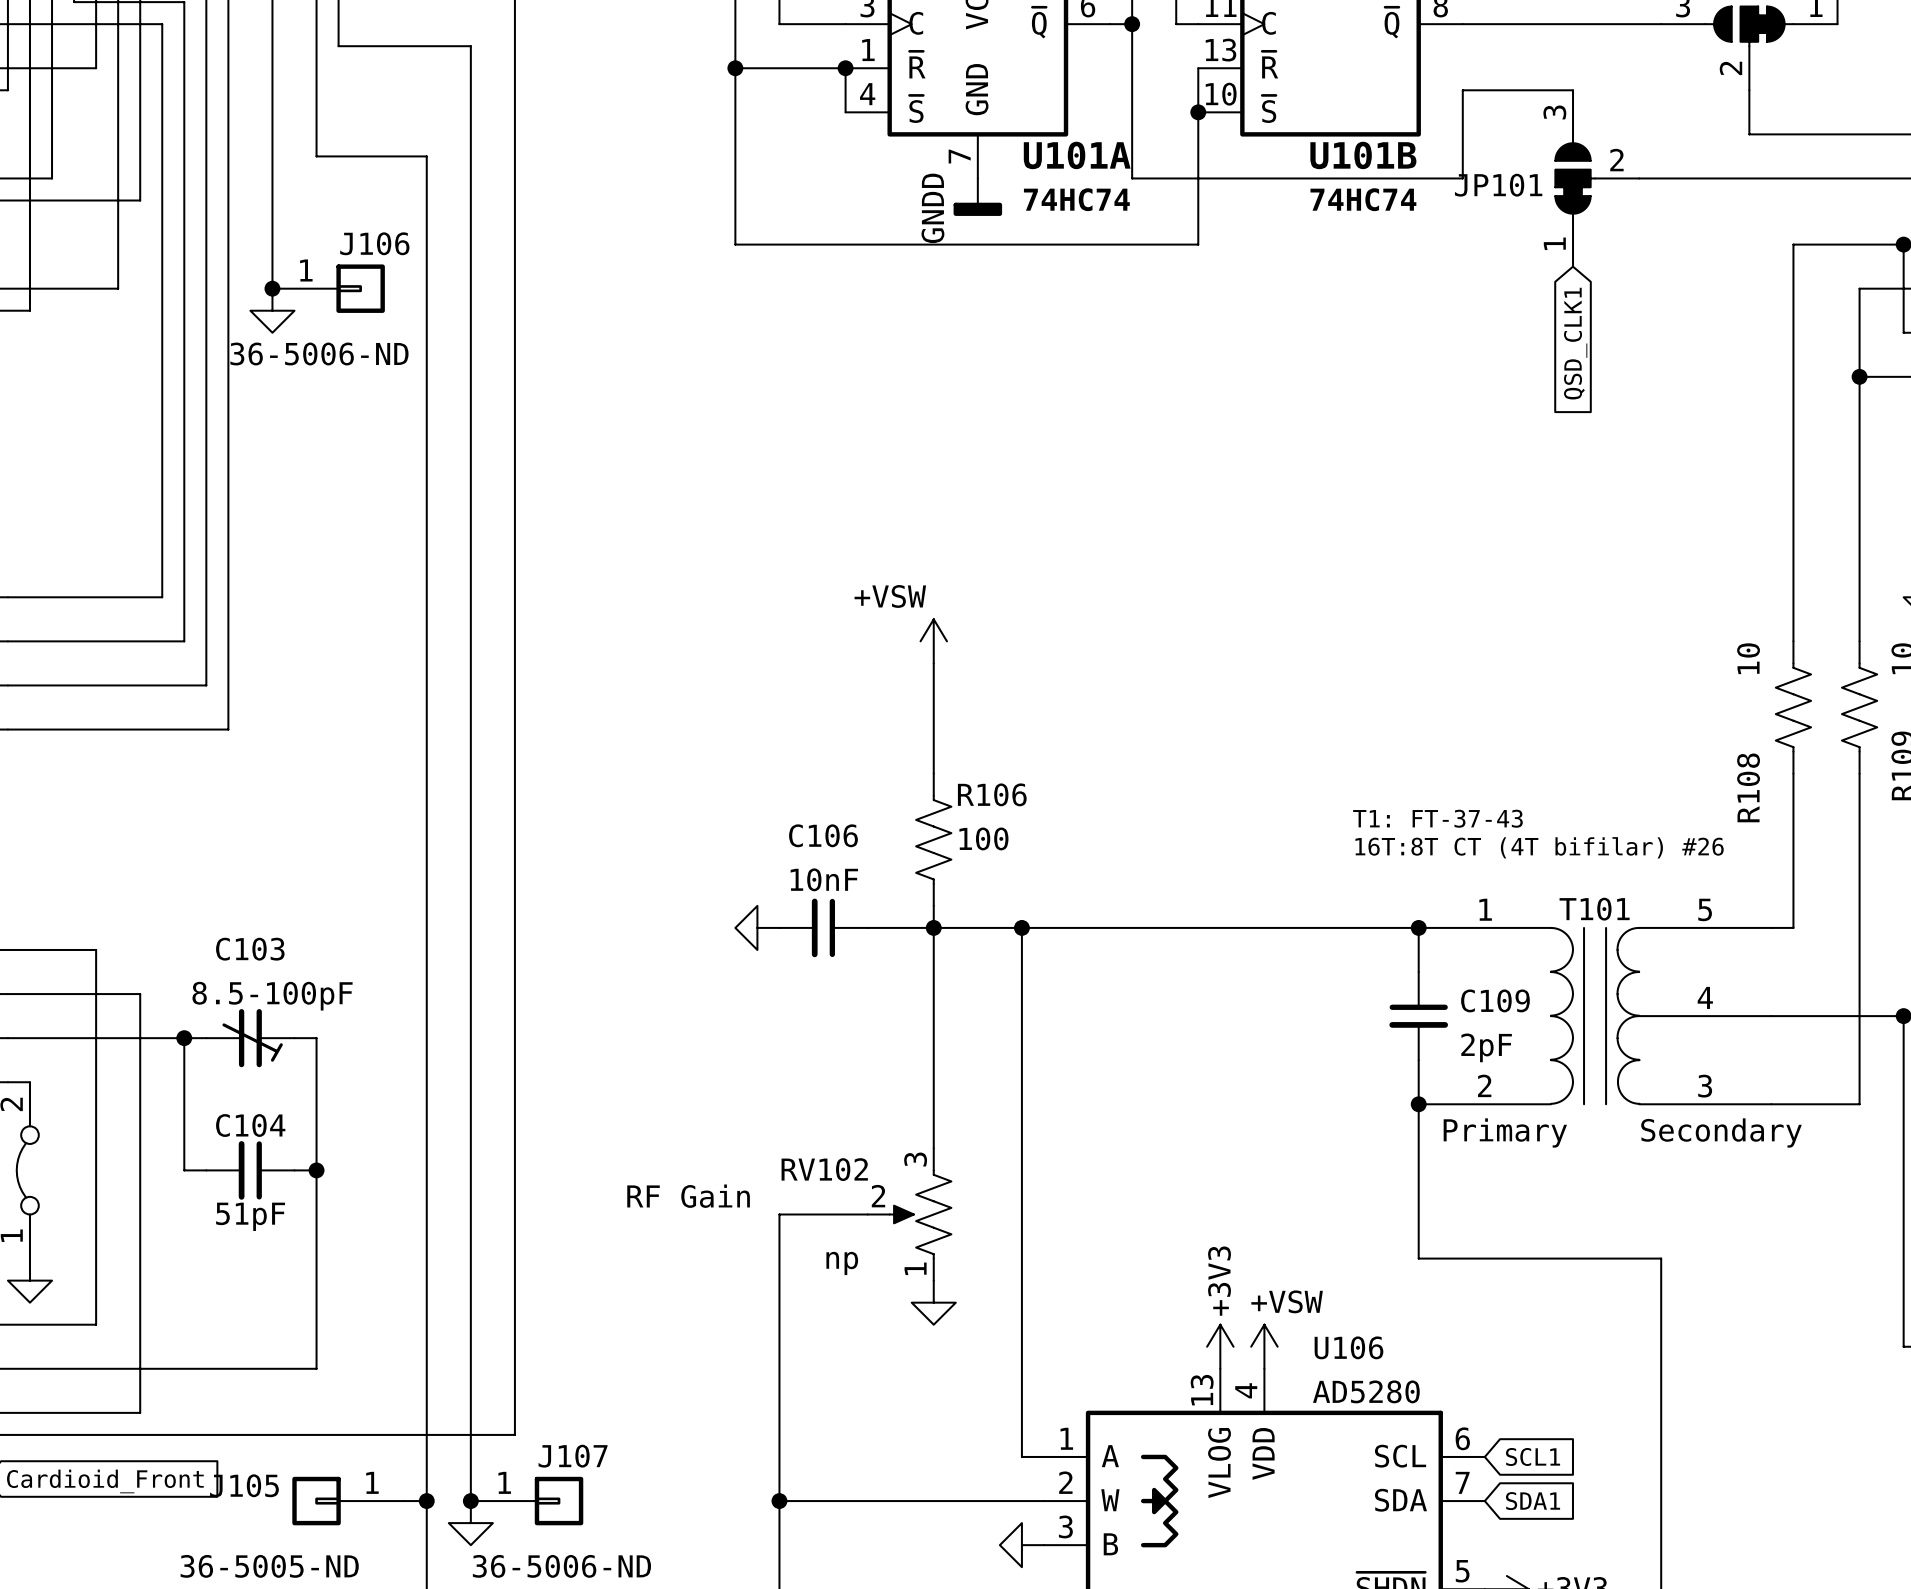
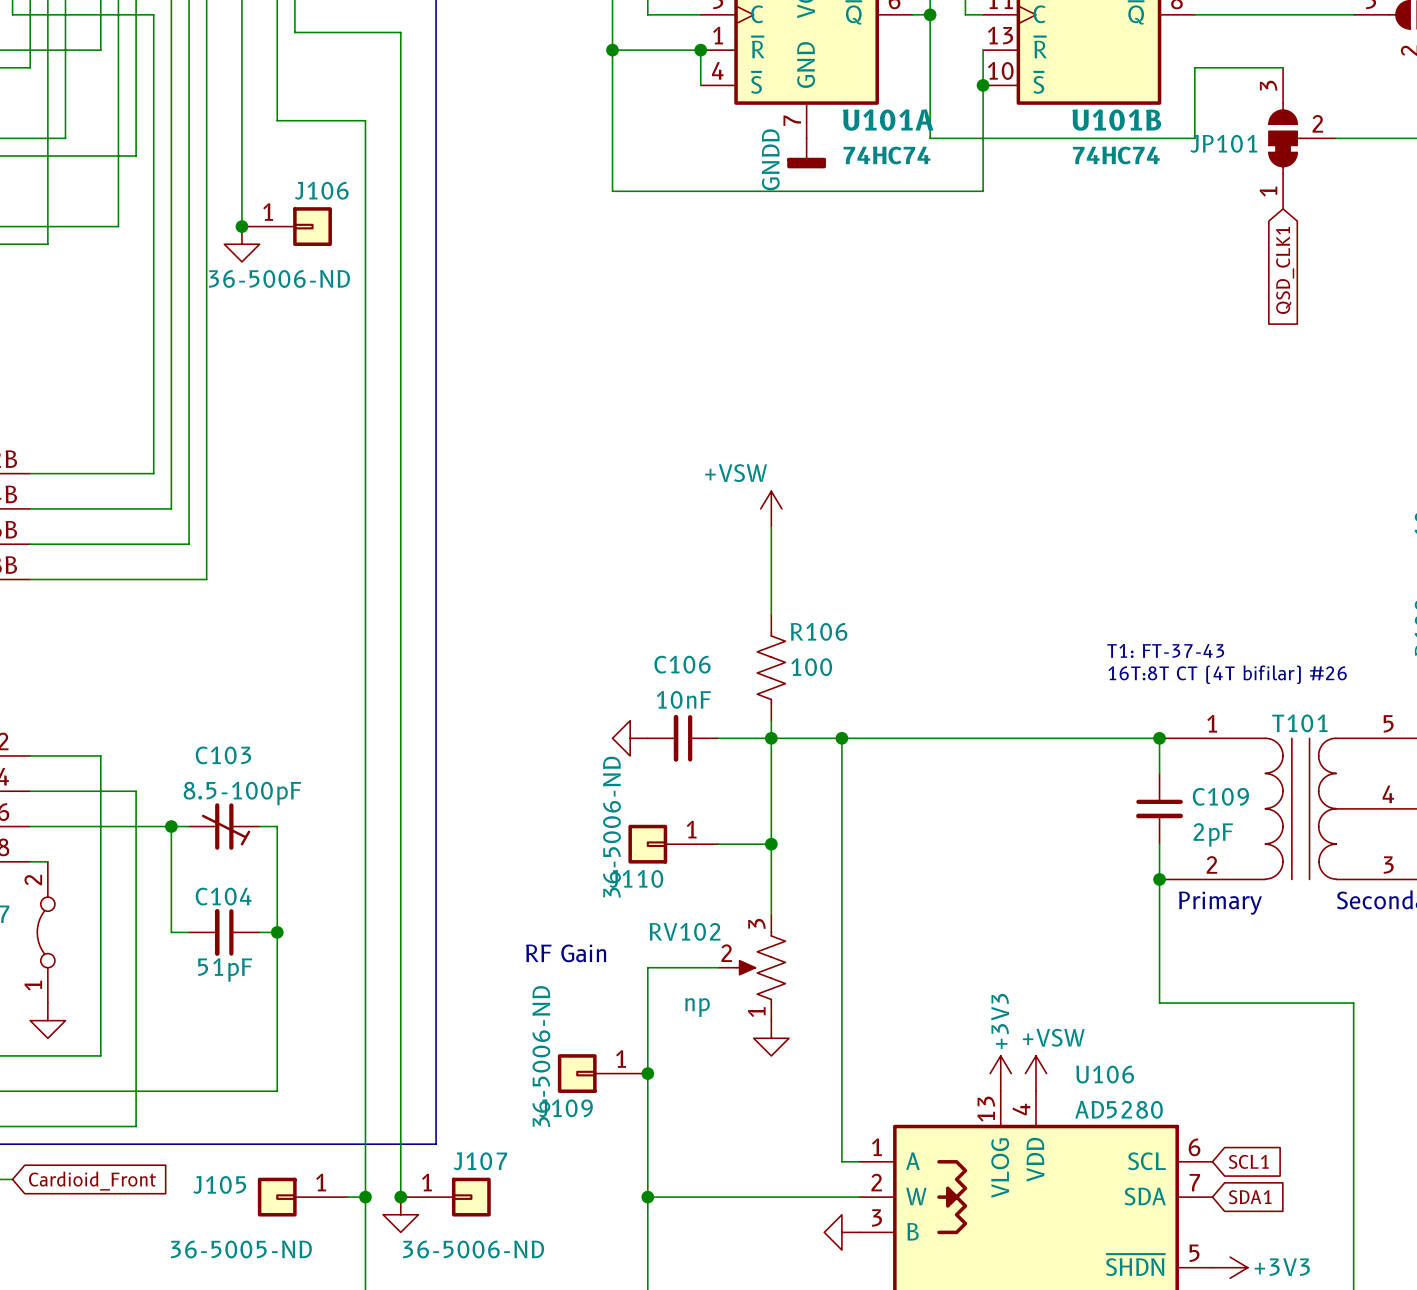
J110: none -> 36-5006-ND (673, 844)
wire: none -> (718, 844) (771, 844)
junction: none -> (771, 844)
J109: none -> 36-5006-ND (602, 1073)
junction: none -> (647, 1073)

